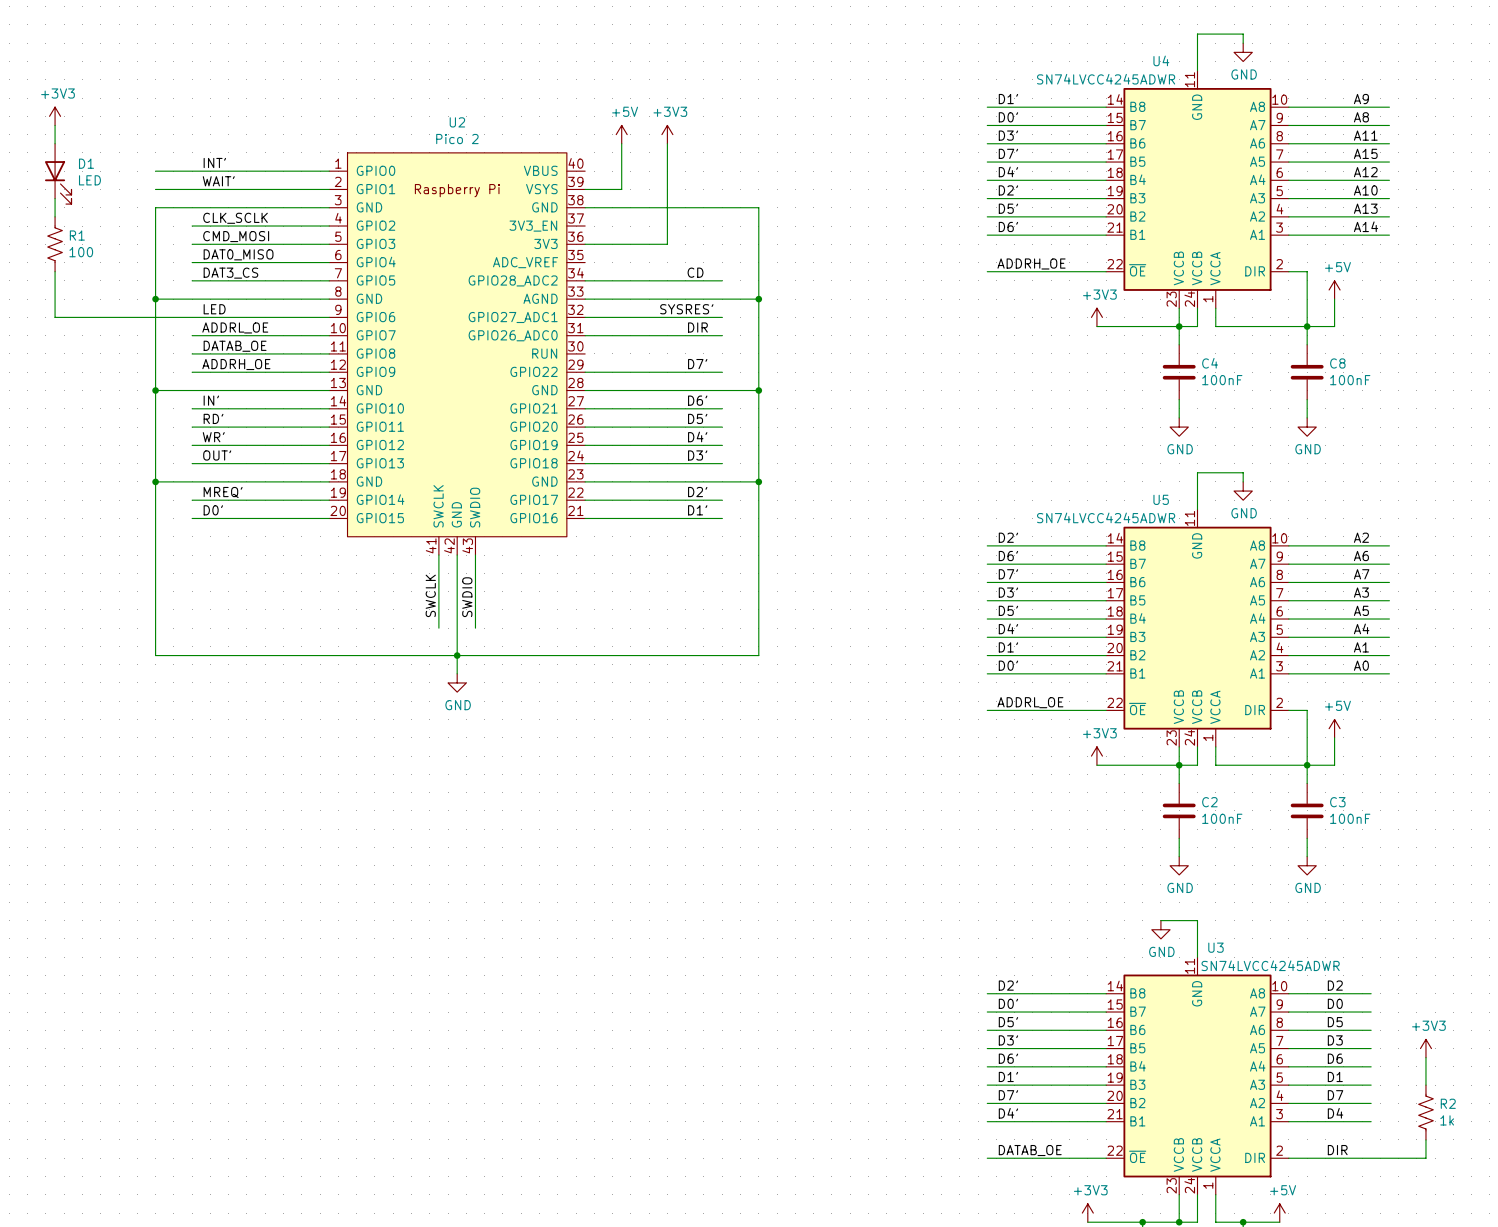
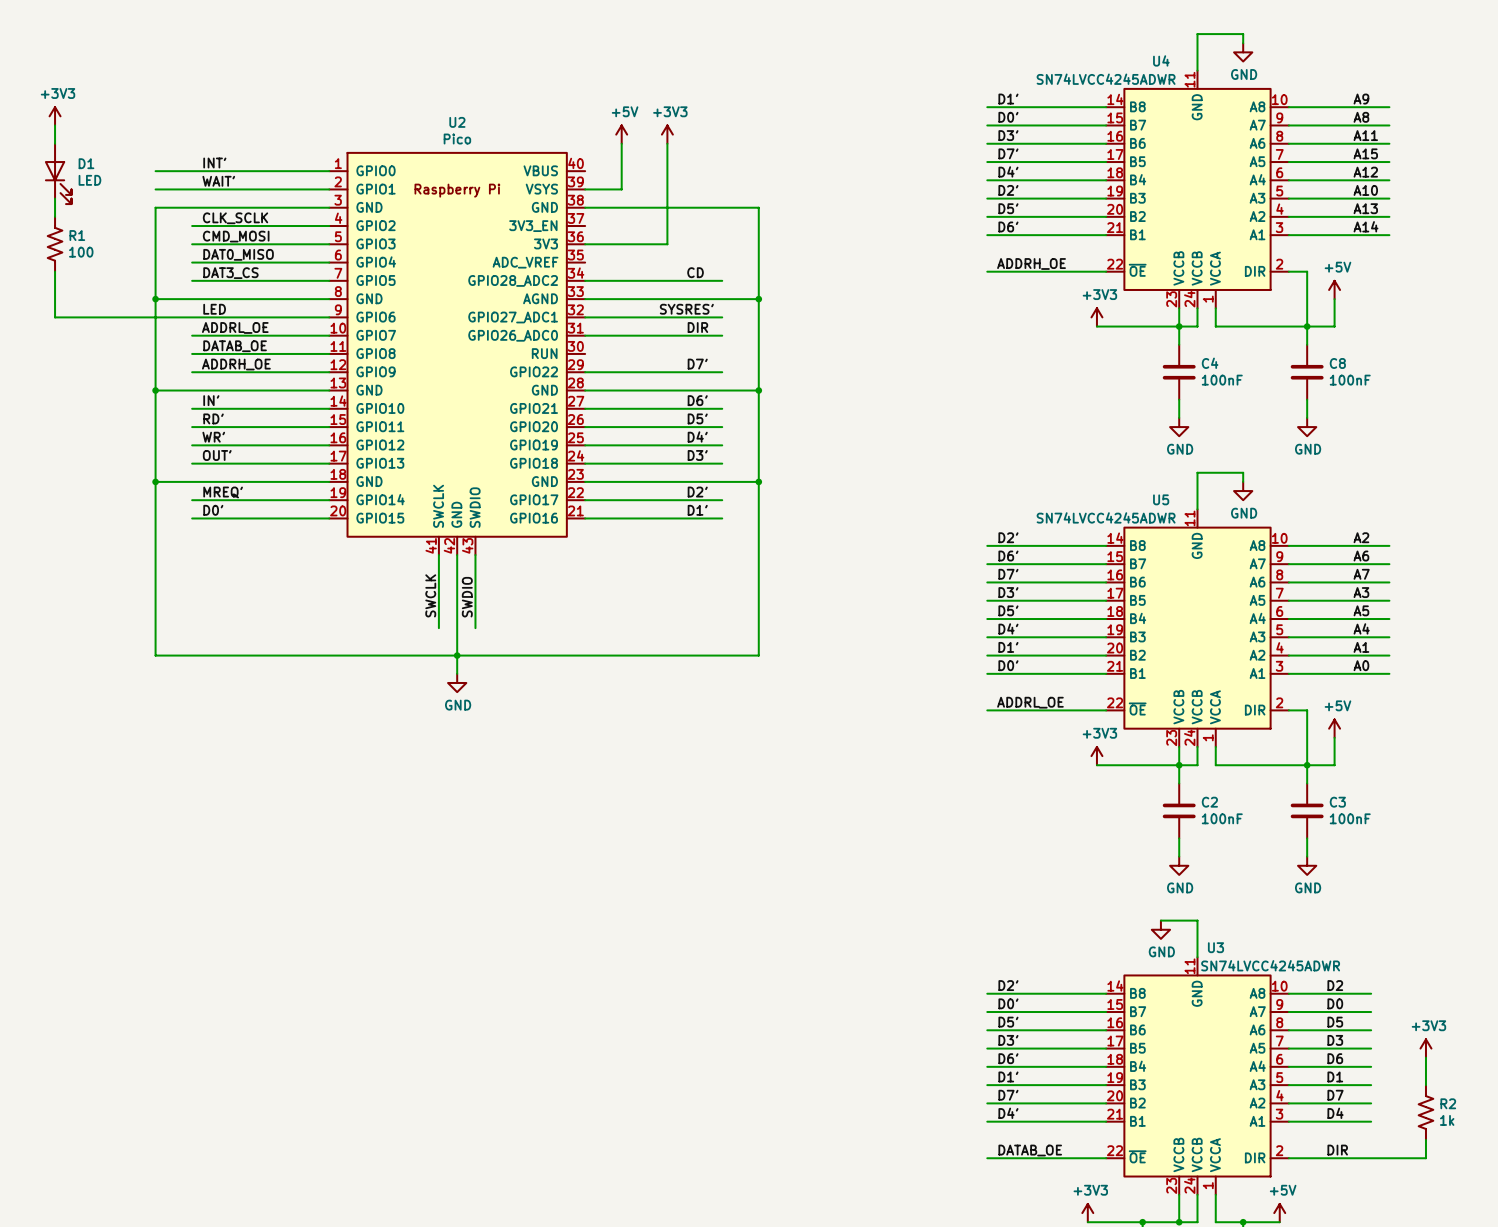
U2 value: Pico 2 (457, 139) -> Pico (457, 139)

